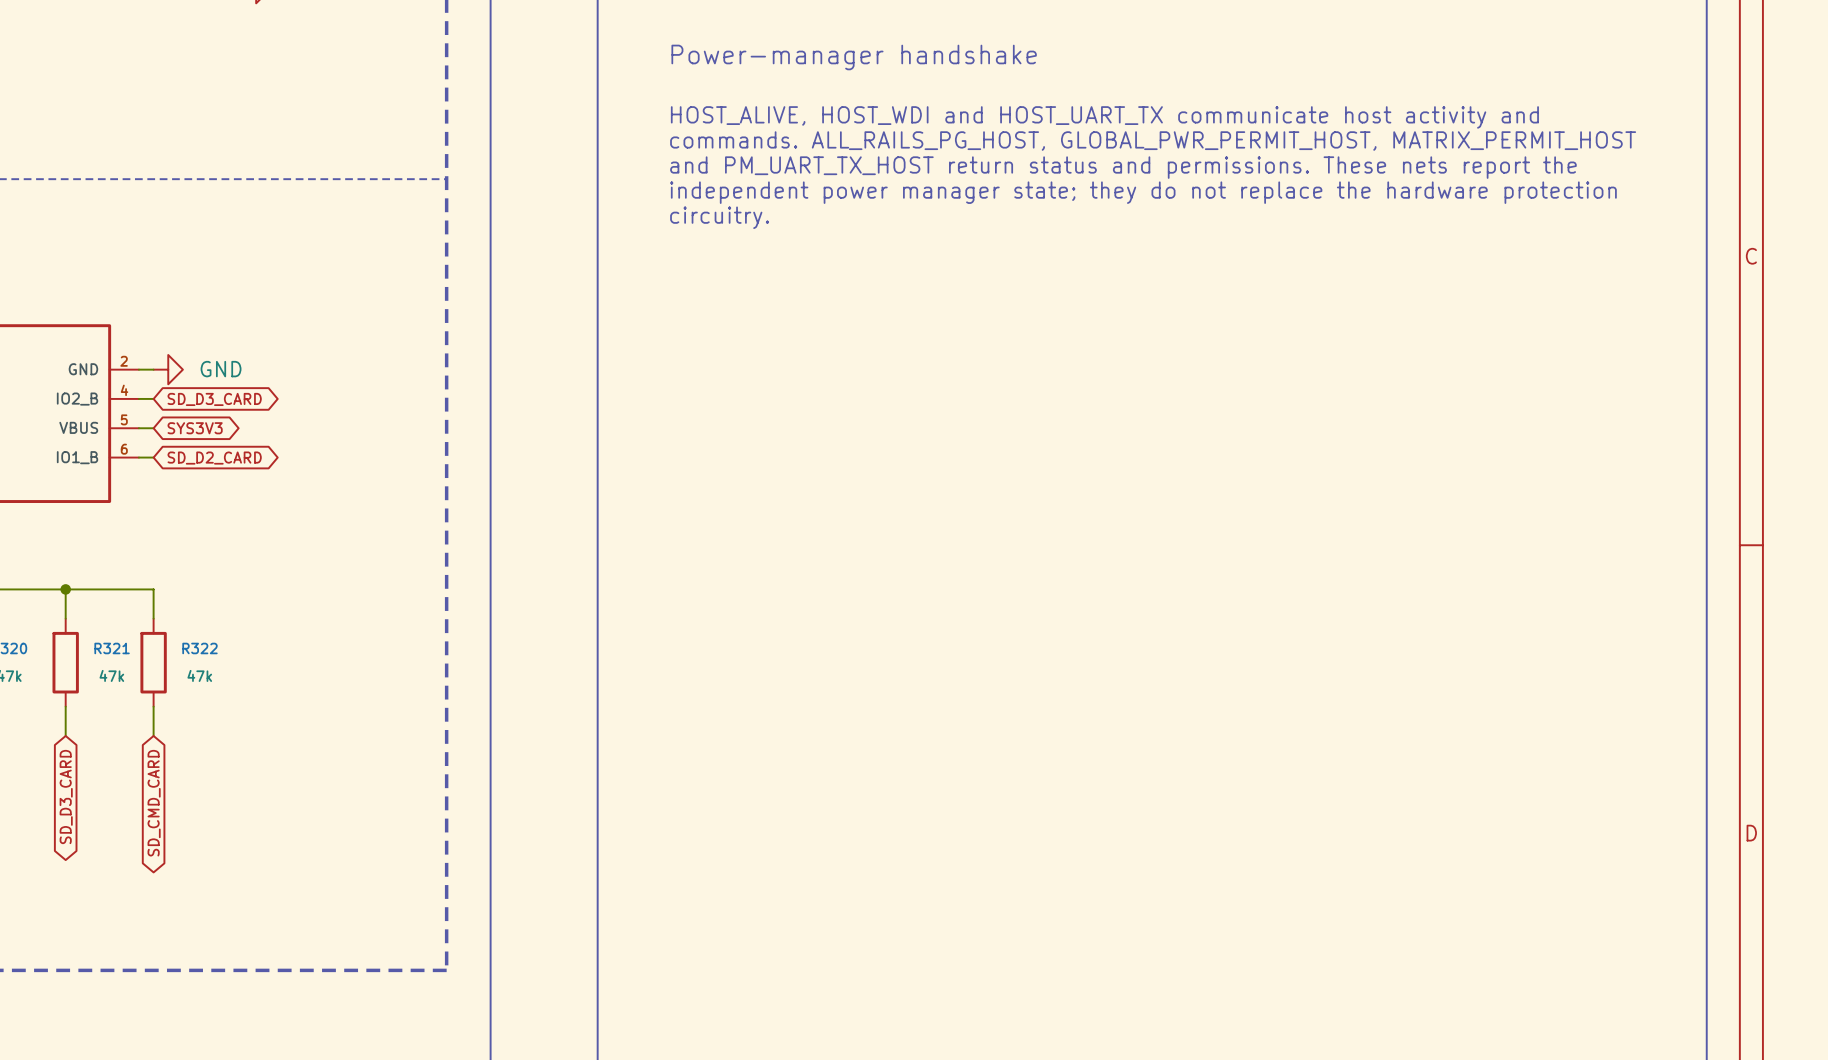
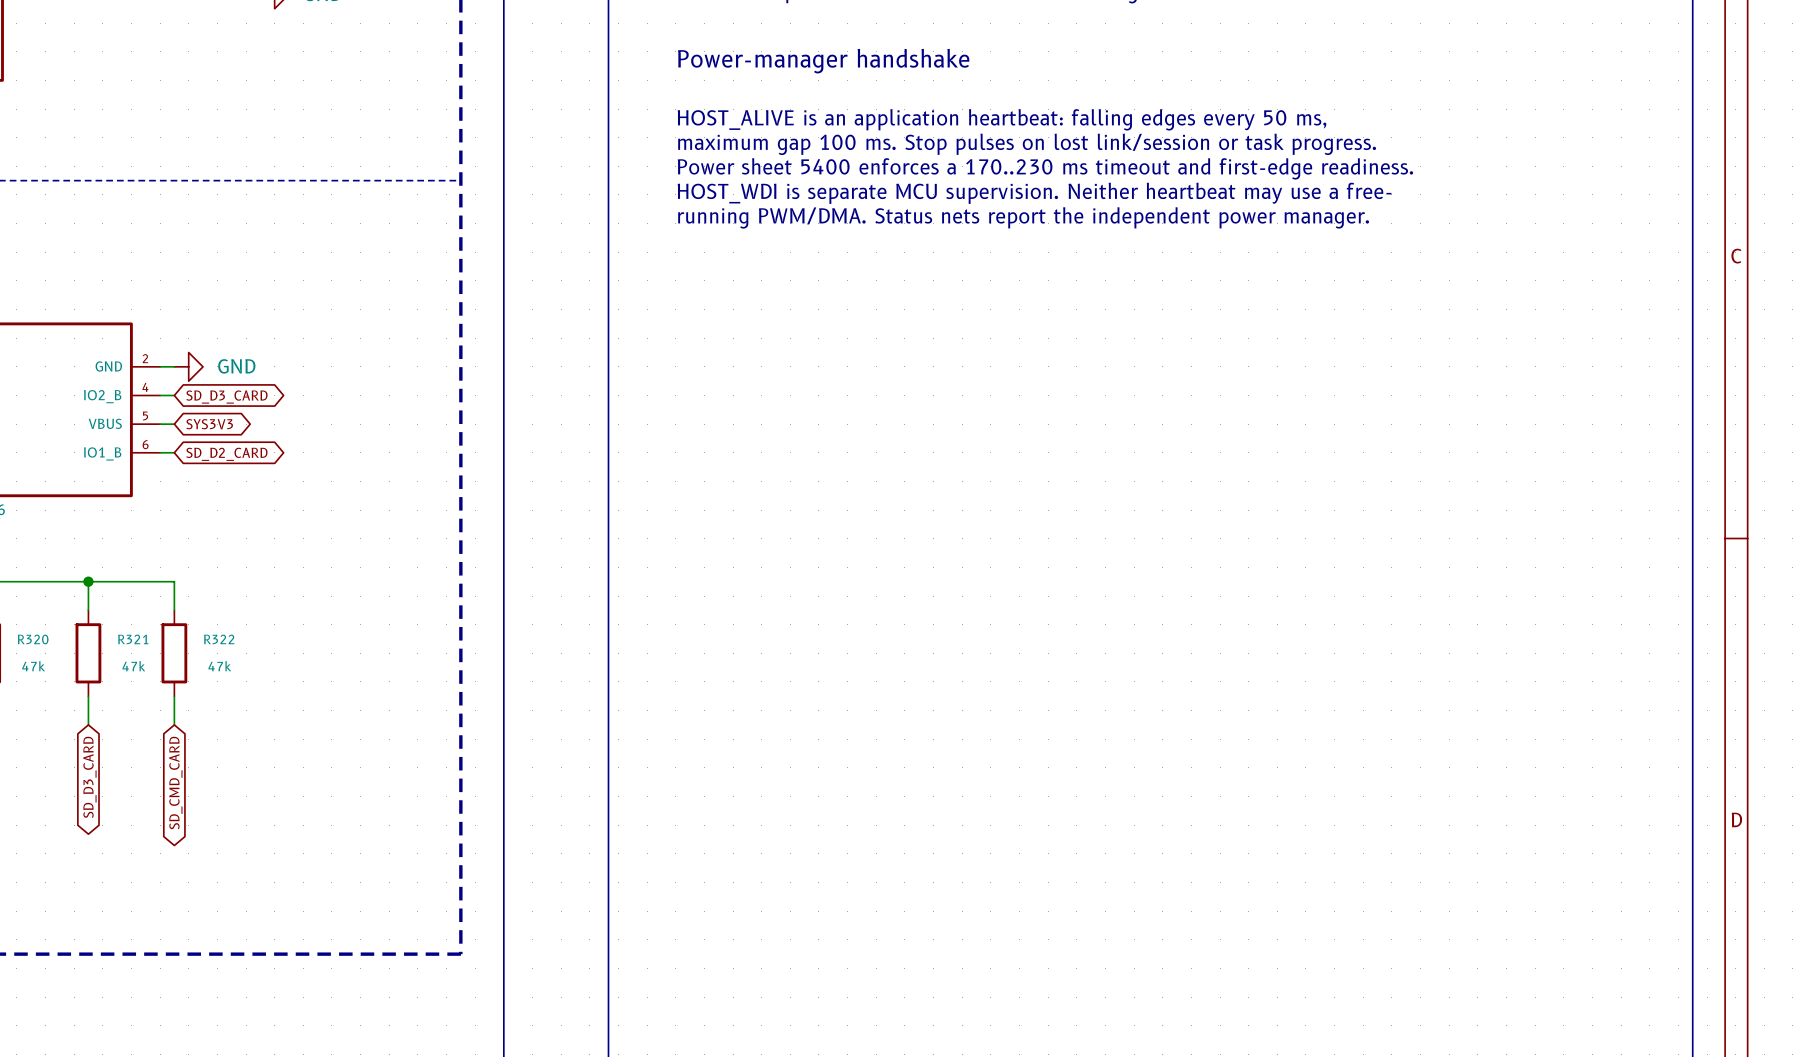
text: HOST_ALIVE, HOST_WDI and HOST_UART_TX communicate host activity and (1104, 117) -> HOST_ALIVE is an application heartbeat: falling edges every 50 ms, (1001, 119)
text: commands. ALL_RAILS_PG_HOST, GLOBAL_PWR_PERMIT_HOST, MATRIX_PERMIT_HOST (1153, 141) -> maximum gap 100 ms. Stop pulses on lost link/session or task progress. (1027, 144)
text: and PM_UART_TX_HOST return status and permissions. These nets report the (1123, 167) -> Power sheet 5400 enforces a 170..230 ms timeout and first-edge readiness. (1045, 168)
text: independent power manager state; they do not replace the hardware protection (1143, 192) -> HOST_WDI is separate MCU supervision. Neither heartbeat may use a free- (1034, 193)
text: circuitry. (719, 217) -> running PWM/DMA. Status nets report the independent power manager. (1023, 217)

